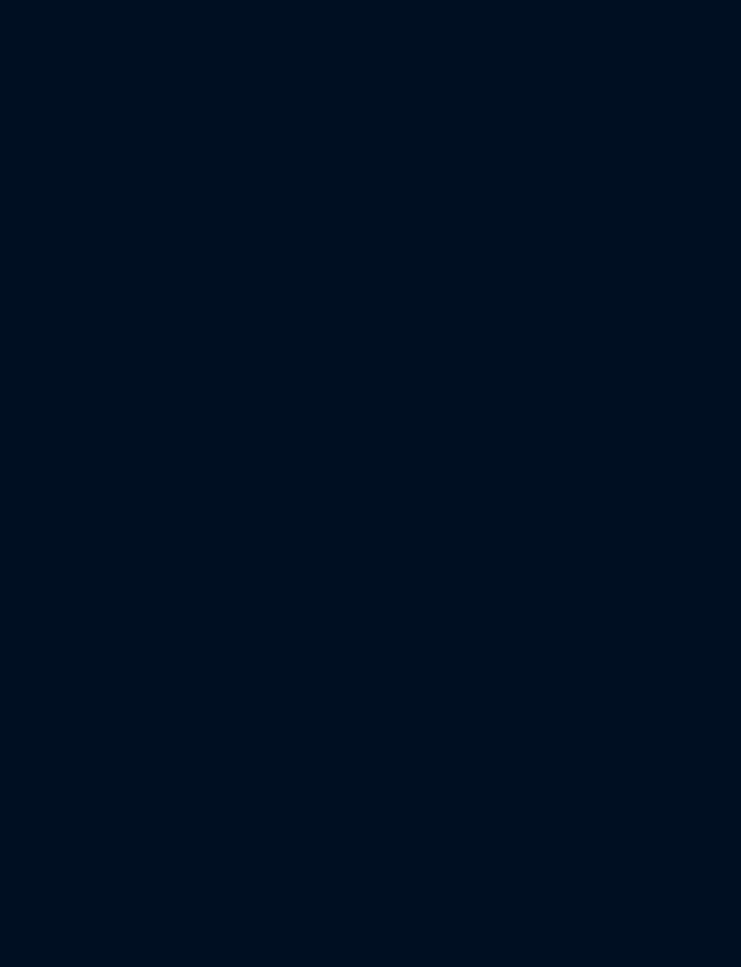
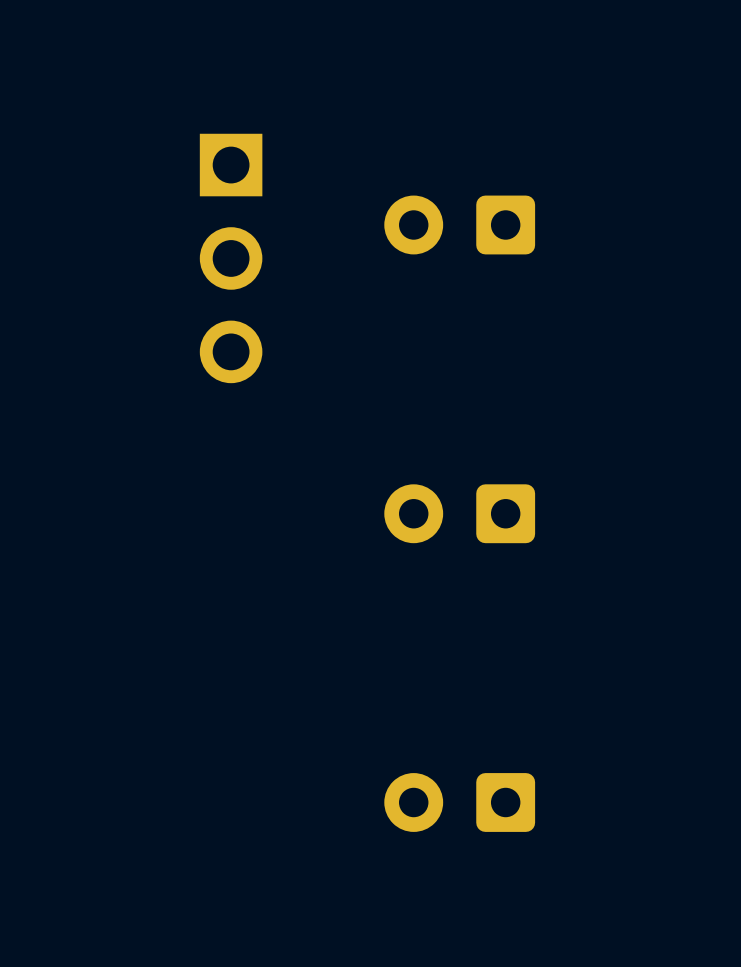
part: none -> (459, 224)
part: none -> (231, 258)
part: none -> (459, 513)
part: none -> (459, 802)

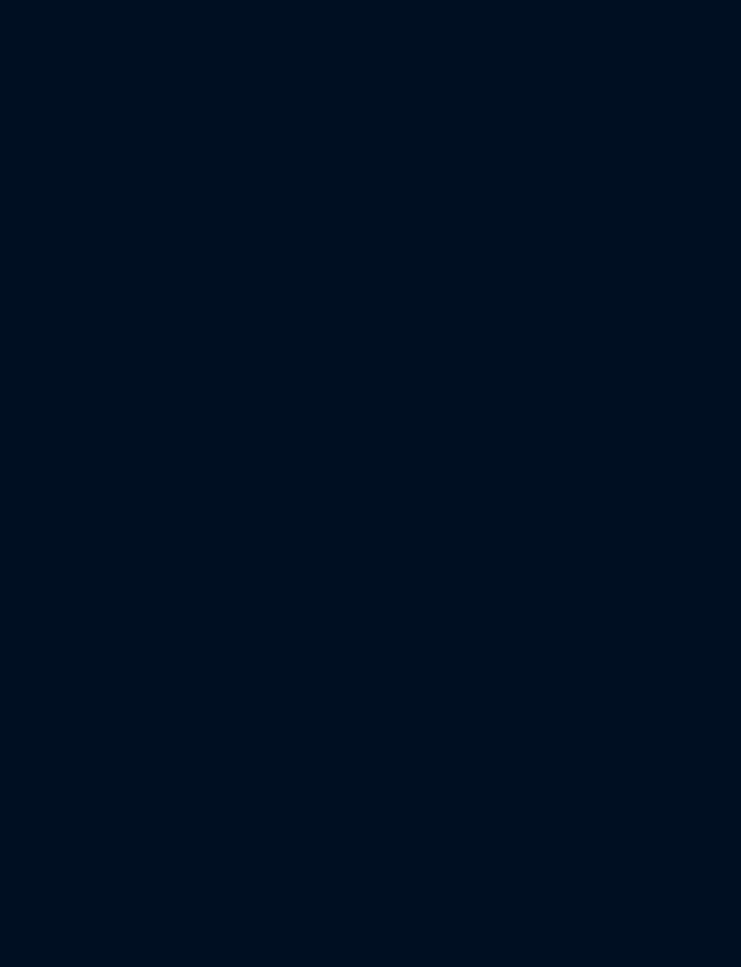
part: (459, 224) -> none
part: (231, 258) -> none
part: (459, 513) -> none
part: (459, 802) -> none

